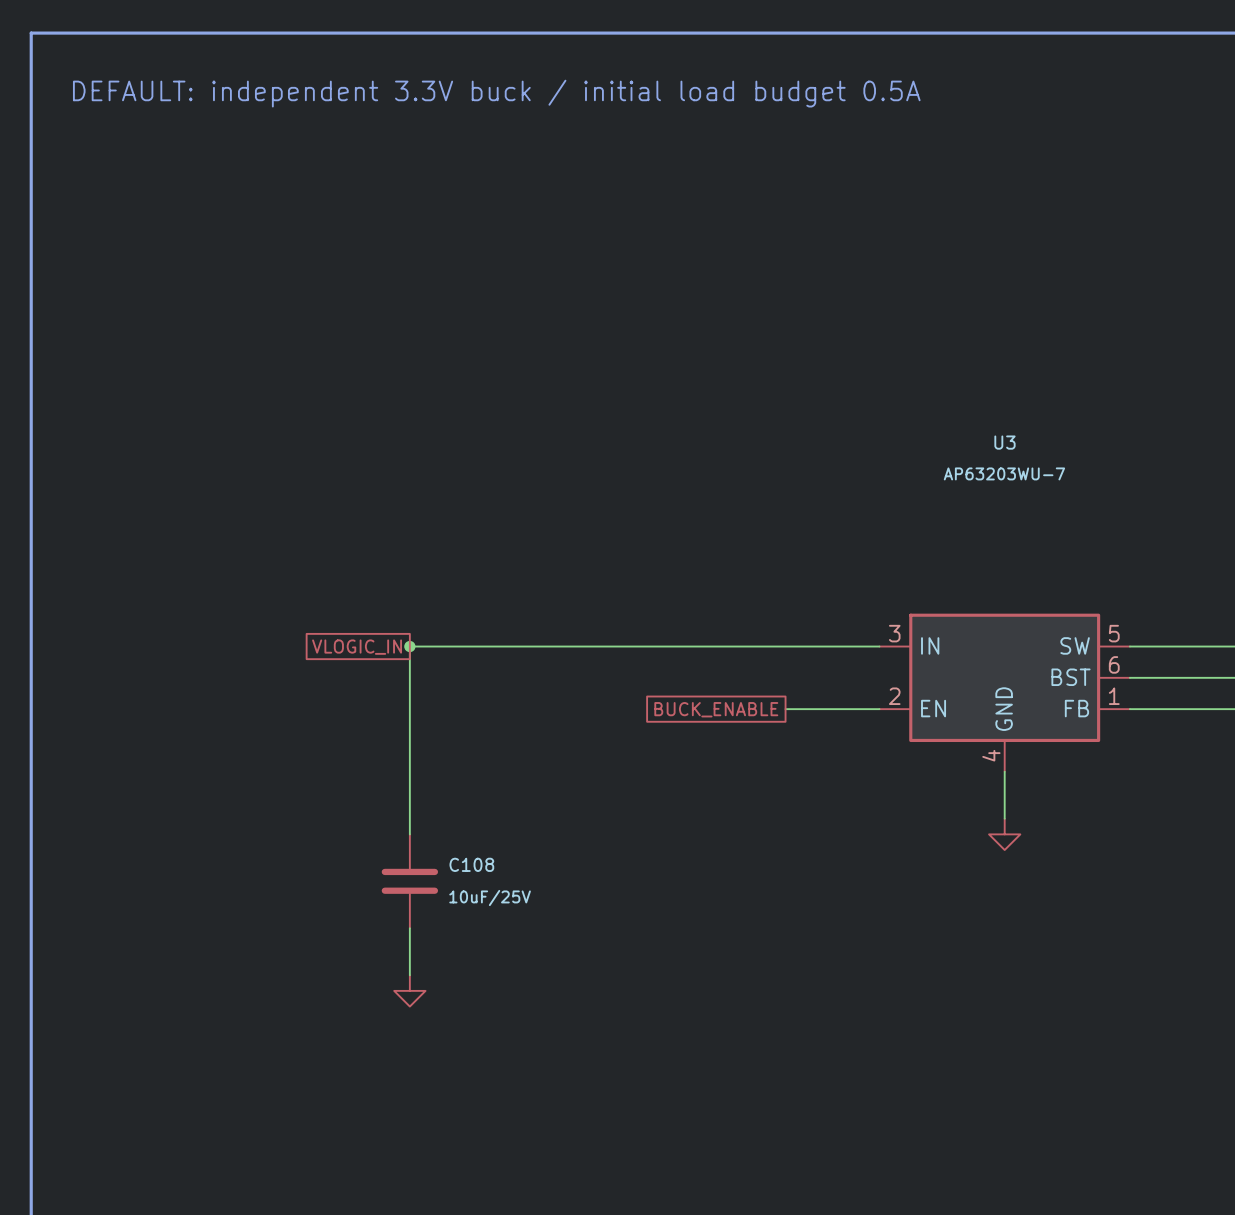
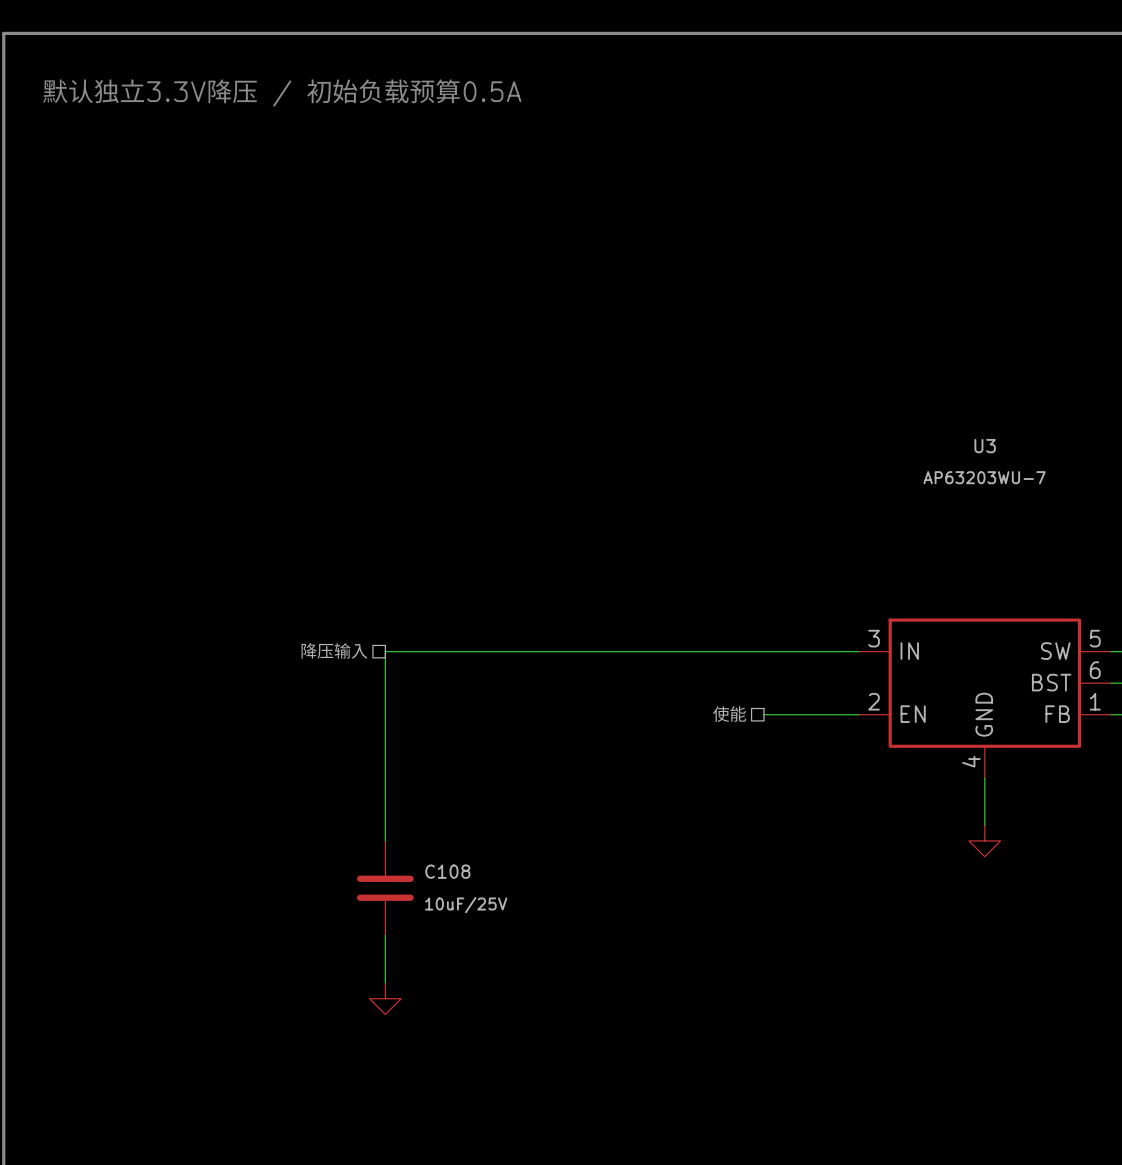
text: DEFAULT: independent 3.3V buck / initial load budget 0.5A (496, 93) -> 默认独立3.3V降压 / 初始负载预算0.5A (281, 92)
hierarchical label: none -> 降压输入 (334, 650)
junction: (409, 646) -> none
global label: VLOGIC_IN (357, 647) -> none
hierarchical label: none -> 使能 (729, 714)
global label: BUCK_ENABLE (716, 709) -> none

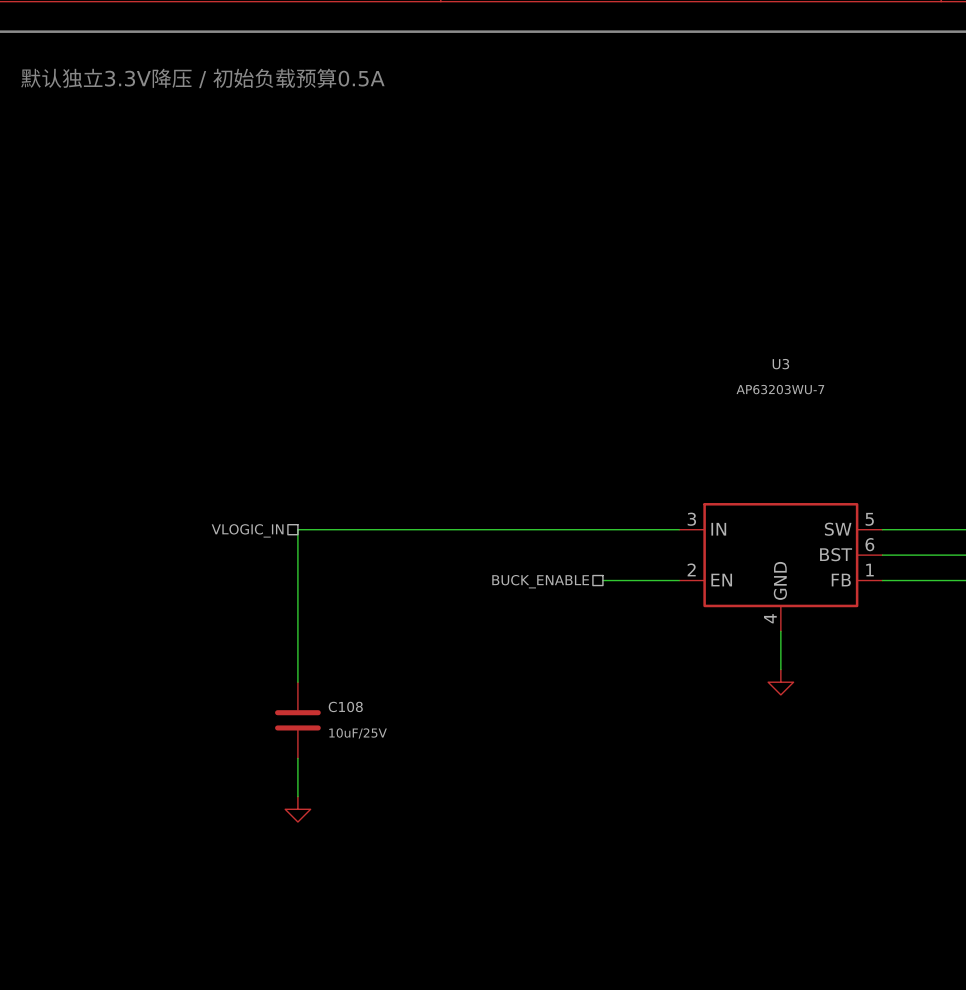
hierarchical label: 降压输入 (334, 650) -> VLOGIC_IN (247, 530)
hierarchical label: 使能 (729, 714) -> BUCK_ENABLE (540, 581)

